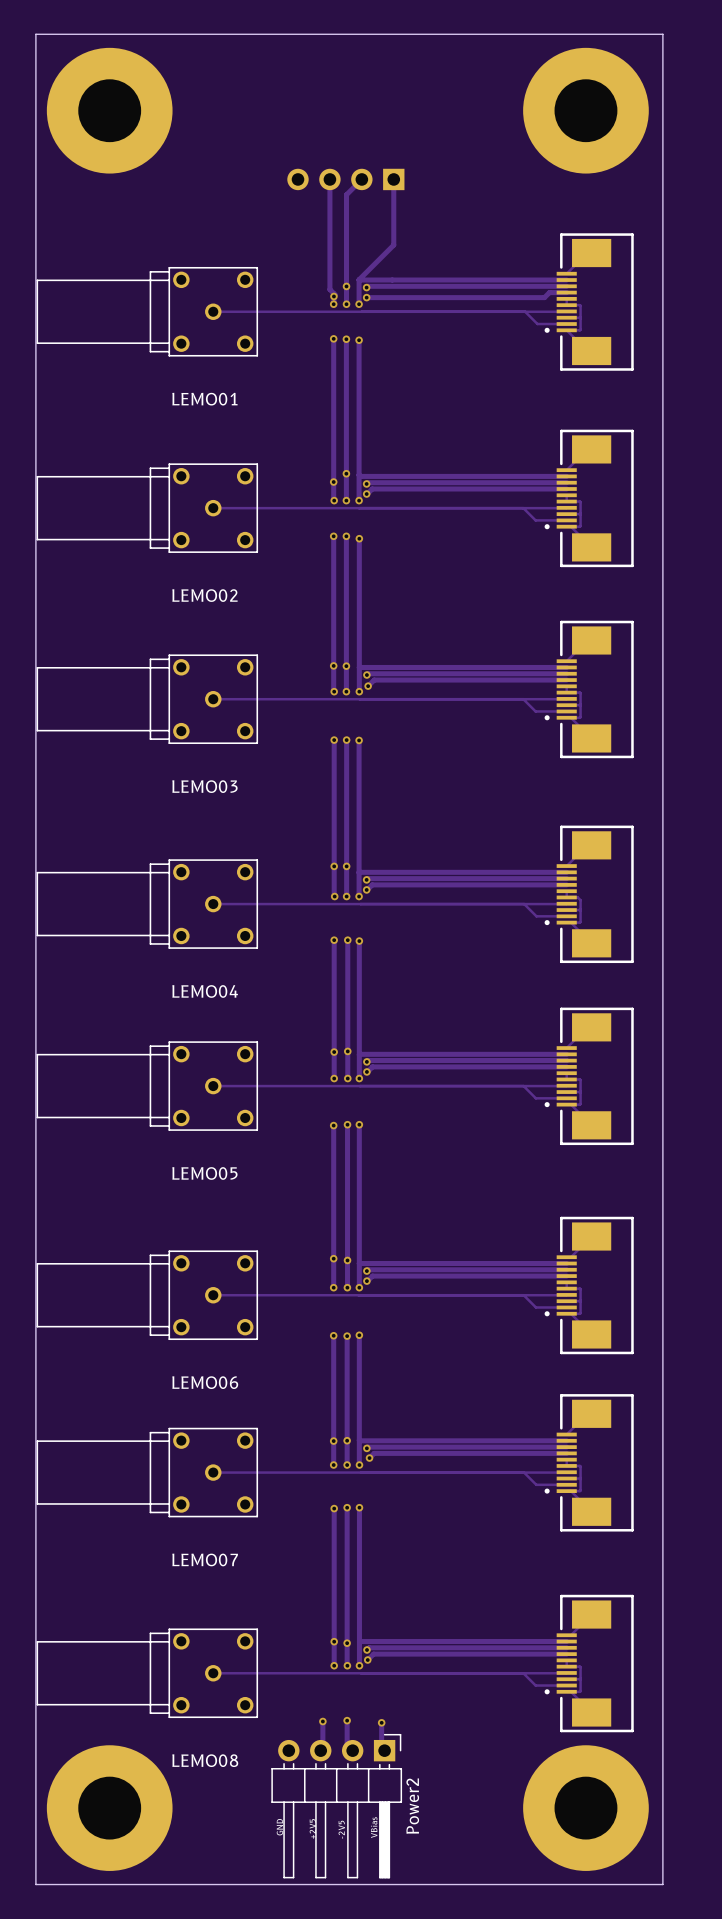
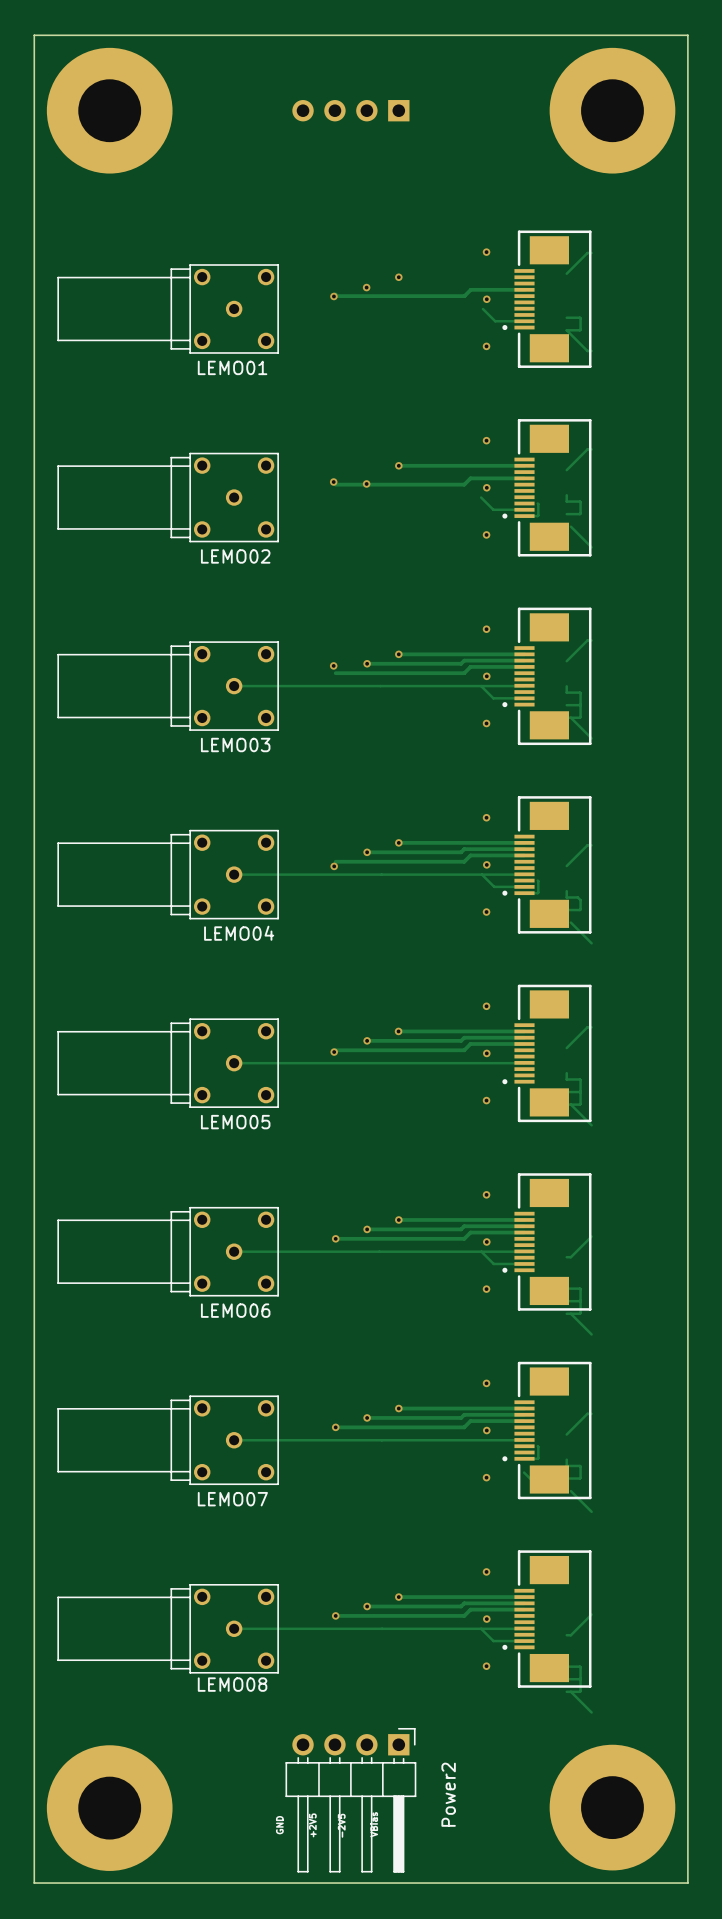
board edge: (35, 34) (662, 34) (662, 1884) (35, 1884) (35, 34) -> (34, 35) (34, 1883) (687, 1883) (687, 35) (34, 35)
part position: (585, 110) -> (612, 110)
track: (329, 179) (329, 289) (333, 293) (333, 304) -> none
part position: (345, 179) -> (350, 110)
track: (361, 179) (346, 194) (346, 304) -> none
track: (393, 179) (393, 245) (359, 280) (566, 280) -> none
via: none -> (486, 252)
via: none -> (398, 277)
track: (359, 279) (359, 304) -> none
via: (346, 286) -> none
track: (566, 286) (366, 287) -> none
track: none -> (524, 289) (470, 289) (464, 296) (335, 296)
track: (566, 292) (549, 292) (544, 297) (366, 297) -> none
via: (366, 297) -> none
track: (566, 298) (566, 305) (580, 305) (579, 317) -> none
via: none -> (486, 299)
part position: (589, 302) -> (546, 299)
via: (333, 304) -> none
via: (346, 304) -> none
via: (359, 304) -> none
LEMO01 position: (147, 311) -> (168, 308)
track: (525, 311) (537, 324) (566, 324) -> (482, 308) (495, 321) (524, 321)
track: (566, 311) (213, 311) -> none
track: (333, 338) (334, 500) -> none
via: (333, 338) -> none
track: (346, 339) (346, 500) -> none
via: (346, 339) -> none
track: (359, 340) (359, 500) -> none
via: (359, 340) -> none
via: none -> (486, 346)
LEMO01 name position: LEMO01 (204, 399) -> LEMO01 (232, 367)
via: none -> (486, 440)
track: none -> (398, 465) (524, 465)
via: none -> (398, 465)
via: (346, 473) -> none
track: (359, 475) (566, 476) -> none
track: none -> (524, 478) (470, 478) (464, 484) (335, 484)
track: (566, 482) (366, 483) -> none
via: none -> (486, 487)
track: (566, 488) (372, 488) (366, 494) -> none
via: (366, 494) -> none
part position: (589, 498) -> (546, 487)
via: (334, 500) -> none
via: (346, 500) -> none
via: (359, 500) -> none
track: (566, 507) (213, 508) -> none
LEMO02 position: (147, 508) -> (168, 497)
track: (523, 508) (535, 520) (566, 520) -> (481, 497) (493, 509) (524, 509)
track: (579, 514) (579, 526) (566, 526) -> (537, 503) (537, 516) (524, 516)
via: none -> (486, 534)
track: (333, 536) (334, 691) -> none
via: (333, 536) -> none
track: (346, 536) (346, 691) -> none
via: (346, 536) -> none
track: (359, 538) (359, 691) -> none
via: (359, 538) -> none
LEMO02 name position: LEMO02 (204, 595) -> LEMO02 (235, 556)
via: none -> (486, 629)
track: none -> (398, 654) (524, 654)
via: none -> (398, 654)
track: none -> (524, 660) (464, 660) (461, 663) (367, 663)
via: none -> (367, 663)
via: (346, 666) -> none
track: none -> (524, 666) (470, 666) (464, 673) (335, 673)
track: (359, 667) (566, 667) -> none
track: (566, 673) (366, 675) -> none
via: (366, 675) -> none
via: none -> (486, 676)
track: (566, 680) (374, 680) (368, 686) -> none
track: none -> (524, 685) (234, 686)
via: (368, 686) -> none
part position: (589, 689) -> (546, 676)
via: (334, 691) -> none
via: (346, 691) -> none
via: (359, 691) -> none
track: (566, 698) (213, 699) -> none
LEMO03 position: (147, 699) -> (168, 686)
track: (523, 699) (535, 711) (566, 711) -> (481, 686) (493, 698) (524, 698)
via: none -> (486, 723)
track: (334, 740) (334, 896) -> none
via: (334, 740) -> none
track: (346, 740) (346, 896) -> none
via: (346, 740) -> none
track: (359, 740) (359, 896) -> none
via: (359, 740) -> none
LEMO03 name position: LEMO03 (204, 786) -> LEMO03 (235, 745)
via: none -> (486, 817)
track: none -> (398, 842) (524, 842)
via: none -> (398, 842)
track: none -> (524, 849) (464, 849) (461, 852) (367, 852)
via: none -> (367, 852)
track: none -> (524, 855) (470, 855) (464, 861) (335, 861)
via: none -> (486, 864)
via: (346, 866) -> none
track: (566, 872) (359, 872) -> none
track: none -> (524, 874) (234, 874)
track: (566, 878) (366, 879) -> none
via: (366, 879) -> none
track: (566, 884) (372, 884) (366, 889) -> none
via: (366, 889) -> none
part position: (589, 894) -> (546, 864)
via: (334, 896) -> none
via: (346, 896) -> none
via: (359, 896) -> none
track: (566, 903) (213, 904) -> none
LEMO04 position: (147, 904) -> (168, 874)
track: (524, 904) (536, 916) (566, 916) -> (481, 874) (494, 886) (524, 886)
track: (579, 910) (579, 922) (566, 922) -> (537, 880) (537, 893) (524, 893)
via: none -> (486, 912)
track: (334, 940) (334, 1078) -> none
via: (334, 940) -> none
track: (347, 940) (347, 1078) -> none
via: (347, 940) -> none
track: (359, 941) (359, 1078) -> none
via: (359, 941) -> none
LEMO04 name position: LEMO04 (205, 991) -> LEMO04 (239, 933)
via: none -> (486, 1006)
track: none -> (398, 1031) (524, 1031)
via: none -> (398, 1031)
track: none -> (524, 1037) (464, 1037) (461, 1040) (367, 1040)
via: none -> (367, 1040)
track: none -> (524, 1044) (470, 1044) (464, 1050) (335, 1050)
via: (347, 1051) -> none
via: none -> (486, 1053)
track: (566, 1054) (359, 1054) -> none
track: (566, 1060) (366, 1061) -> none
via: (366, 1061) -> none
track: none -> (524, 1062) (234, 1063)
track: (566, 1066) (372, 1066) (366, 1071) -> none
via: (366, 1071) -> none
part position: (589, 1076) -> (546, 1053)
via: (334, 1078) -> none
via: (347, 1078) -> none
via: (359, 1078) -> none
track: (566, 1085) (213, 1086) -> none
LEMO05 position: (147, 1086) -> (168, 1063)
track: (523, 1086) (535, 1098) (566, 1098) -> none
via: none -> (486, 1100)
track: (347, 1124) (347, 1287) -> none
via: (347, 1124) -> none
track: (359, 1124) (359, 1287) -> none
via: (359, 1124) -> none
track: (333, 1125) (333, 1287) -> none
via: (333, 1125) -> none
LEMO05 name position: LEMO05 (204, 1173) -> LEMO05 (235, 1122)
via: none -> (486, 1194)
track: none -> (398, 1219) (524, 1219)
via: none -> (398, 1219)
track: none -> (524, 1226) (464, 1226) (461, 1229) (367, 1229)
via: none -> (367, 1229)
track: none -> (524, 1232) (470, 1232) (464, 1238) (335, 1238)
via: none -> (335, 1238)
via: none -> (486, 1241)
track: none -> (524, 1251) (234, 1251)
via: (333, 1258) -> none
via: (347, 1260) -> none
track: (359, 1263) (566, 1263) -> none
track: (566, 1269) (366, 1271) -> none
via: (366, 1271) -> none
track: (566, 1276) (372, 1276) (366, 1281) -> none
via: (366, 1281) -> none
part position: (589, 1285) -> (546, 1241)
via: (333, 1287) -> none
via: (347, 1287) -> none
via: (359, 1287) -> none
via: none -> (486, 1289)
track: (566, 1294) (213, 1295) -> none
LEMO06 position: (147, 1295) -> (168, 1251)
track: (523, 1295) (535, 1307) (566, 1307) -> (481, 1251) (493, 1263) (524, 1263)
track: (333, 1335) (333, 1465) -> none
via: (333, 1335) -> none
track: (359, 1335) (359, 1464) -> none
via: (359, 1335) -> none
track: (347, 1336) (347, 1465) -> none
via: (347, 1336) -> none
LEMO06 name position: LEMO06 (205, 1382) -> LEMO06 (235, 1310)
via: none -> (486, 1383)
track: none -> (398, 1408) (524, 1408)
via: none -> (398, 1408)
track: none -> (524, 1414) (464, 1414) (461, 1417) (367, 1417)
via: none -> (367, 1417)
track: none -> (524, 1421) (470, 1421) (464, 1427) (335, 1427)
via: none -> (335, 1427)
via: none -> (486, 1430)
track: none -> (524, 1439) (234, 1440)
via: (347, 1440) -> none
track: (359, 1440) (566, 1440) -> none
via: (333, 1441) -> none
track: (566, 1447) (366, 1448) -> none
via: (366, 1448) -> none
track: (566, 1453) (374, 1453) (369, 1458) -> none
via: (369, 1458) -> none
part position: (589, 1462) -> (546, 1430)
via: (333, 1465) -> none
via: (347, 1465) -> none
via: (359, 1465) -> none
LEMO07 position: (147, 1472) -> (168, 1440)
track: (566, 1472) (213, 1472) -> none
via: none -> (486, 1477)
track: (579, 1478) (579, 1491) (566, 1491) -> (537, 1446) (537, 1458) (524, 1458)
track: (347, 1507) (347, 1665) -> none
via: (347, 1507) -> none
track: (359, 1507) (359, 1665) -> none
via: (359, 1507) -> none
track: (334, 1508) (334, 1665) -> none
via: (334, 1508) -> none
LEMO07 name position: LEMO07 (205, 1559) -> LEMO07 (232, 1499)
via: none -> (486, 1571)
track: none -> (398, 1597) (524, 1597)
via: none -> (398, 1597)
track: none -> (524, 1603) (464, 1603) (461, 1606) (367, 1606)
via: none -> (367, 1606)
track: none -> (524, 1609) (470, 1609) (464, 1615) (335, 1615)
via: none -> (335, 1615)
via: none -> (486, 1619)
track: none -> (524, 1628) (234, 1628)
via: (334, 1641) -> none
track: (359, 1641) (566, 1641) -> none
via: (347, 1643) -> none
track: (566, 1647) (369, 1647) (367, 1649) -> none
via: (367, 1649) -> none
track: (566, 1654) (373, 1654) (367, 1660) -> none
via: (367, 1660) -> none
part position: (589, 1663) -> (546, 1619)
via: (334, 1665) -> none
via: (347, 1665) -> none
via: (359, 1665) -> none
via: none -> (486, 1666)
track: (566, 1672) (213, 1673) -> none
LEMO08 position: (147, 1673) -> (168, 1628)
track: (523, 1673) (535, 1685) (566, 1685) -> (481, 1628) (493, 1641) (524, 1641)
track: (347, 1720) (347, 1745) (352, 1750) -> none
via: (347, 1720) -> none
track: (322, 1721) (322, 1748) (320, 1750) -> none
via: (322, 1721) -> none
track: (381, 1722) (381, 1747) (384, 1750) -> none
via: (381, 1722) -> none
LEMO08 name position: LEMO08 (205, 1760) -> LEMO08 (232, 1684)
Power2 position: (336, 1806) -> (350, 1800)
Power2 name position: Power2 (412, 1806) -> Power2 (448, 1794)
part position: (585, 1808) -> (612, 1807)

